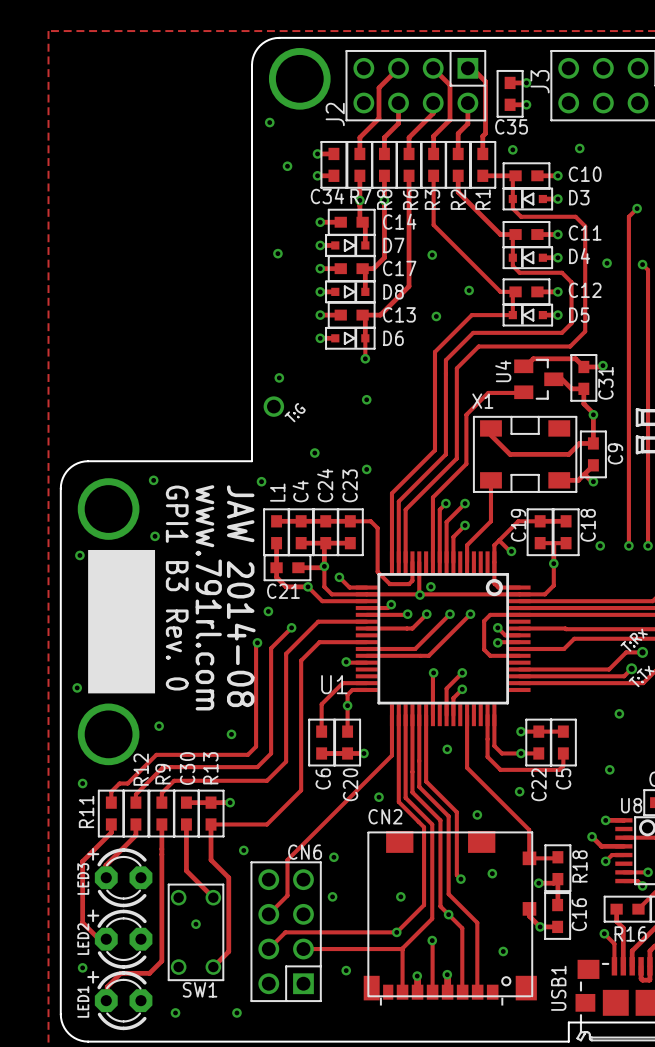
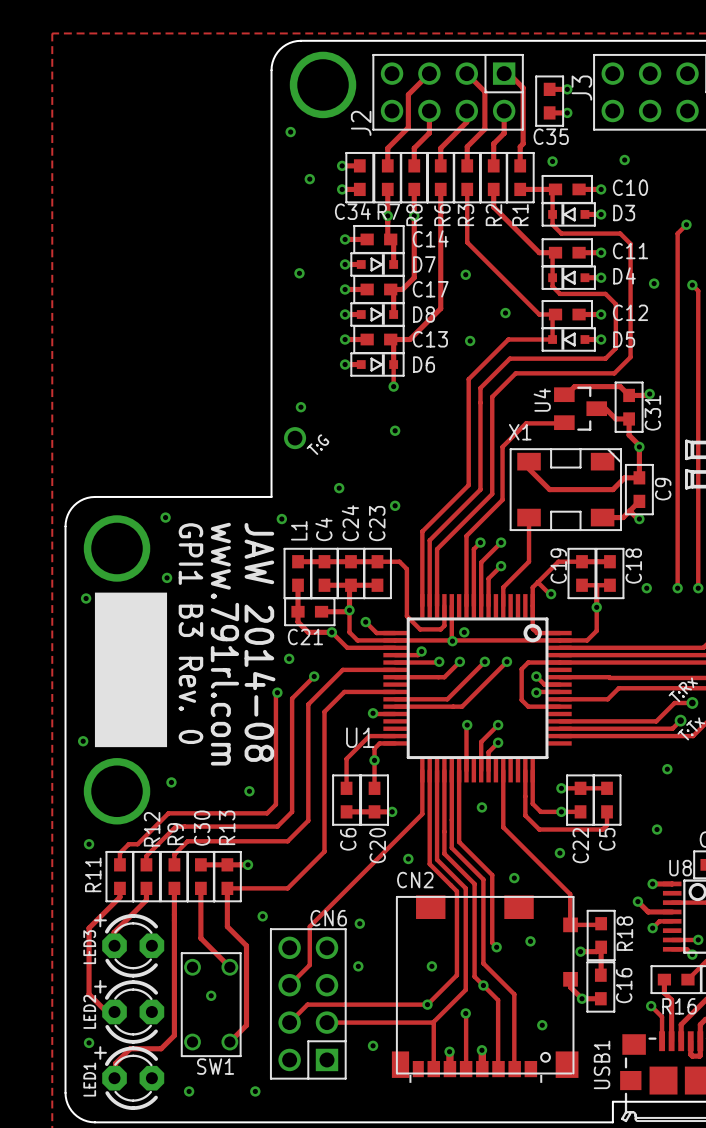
part footprint: [473, 416, 578, 493] -> [509, 448, 622, 531]

